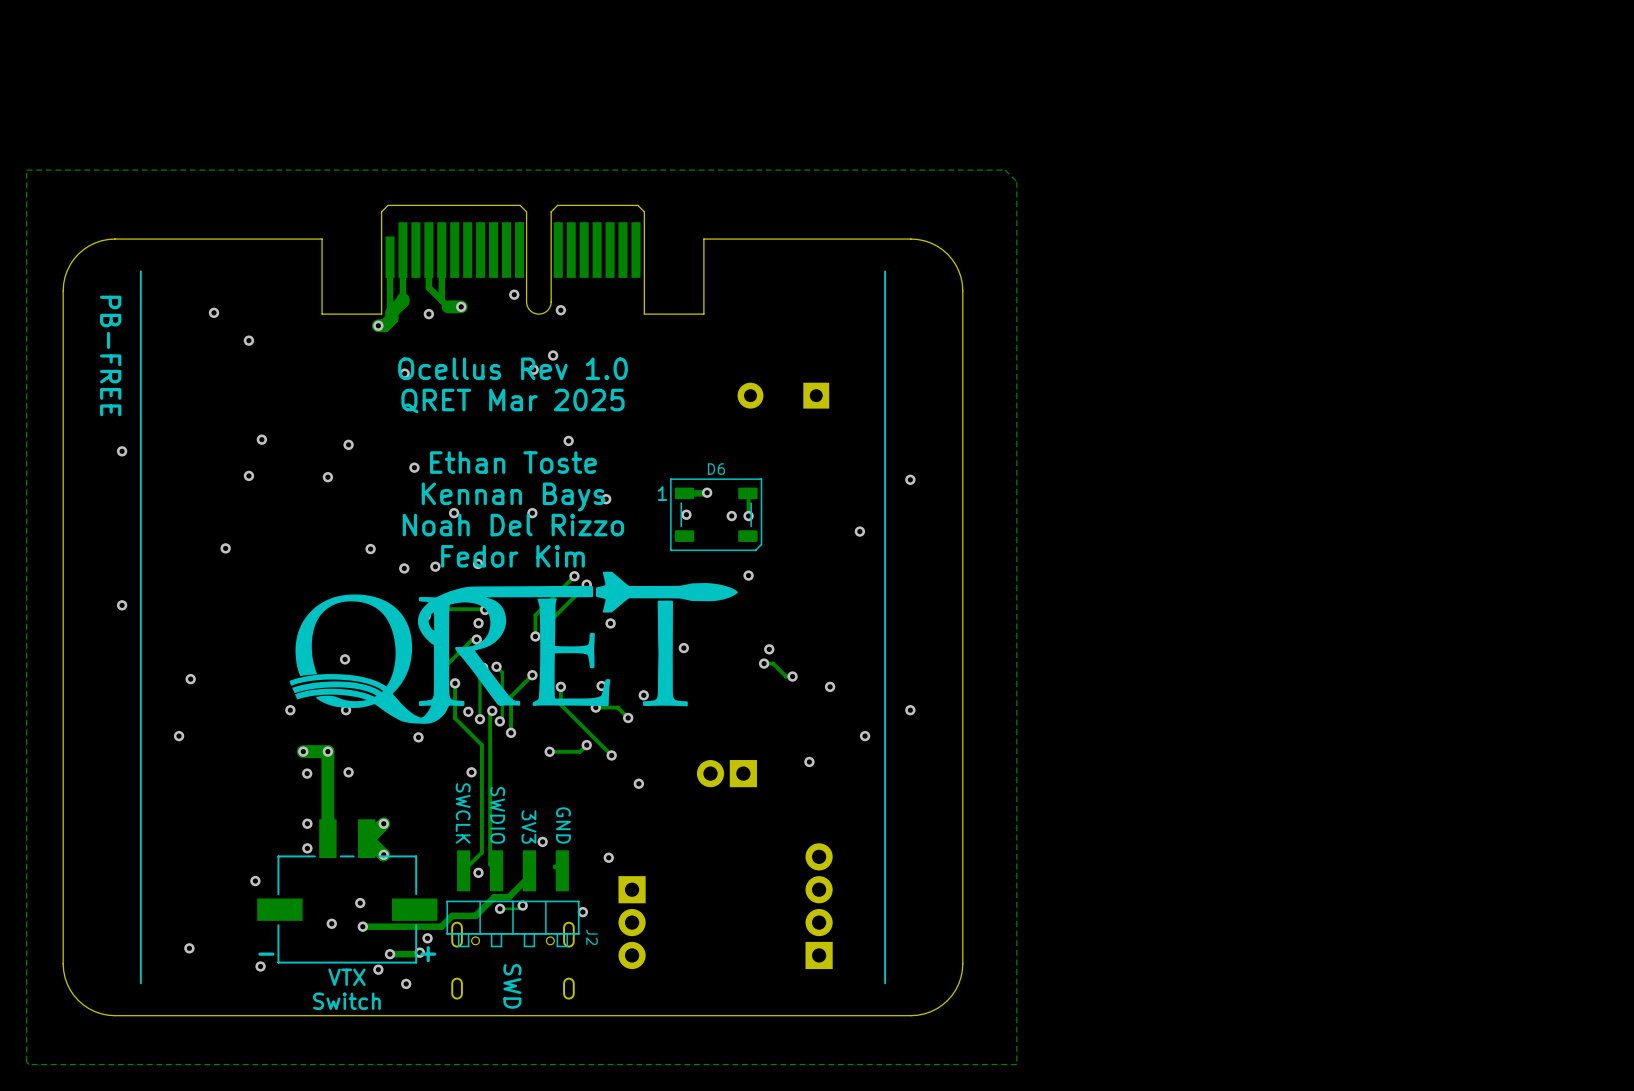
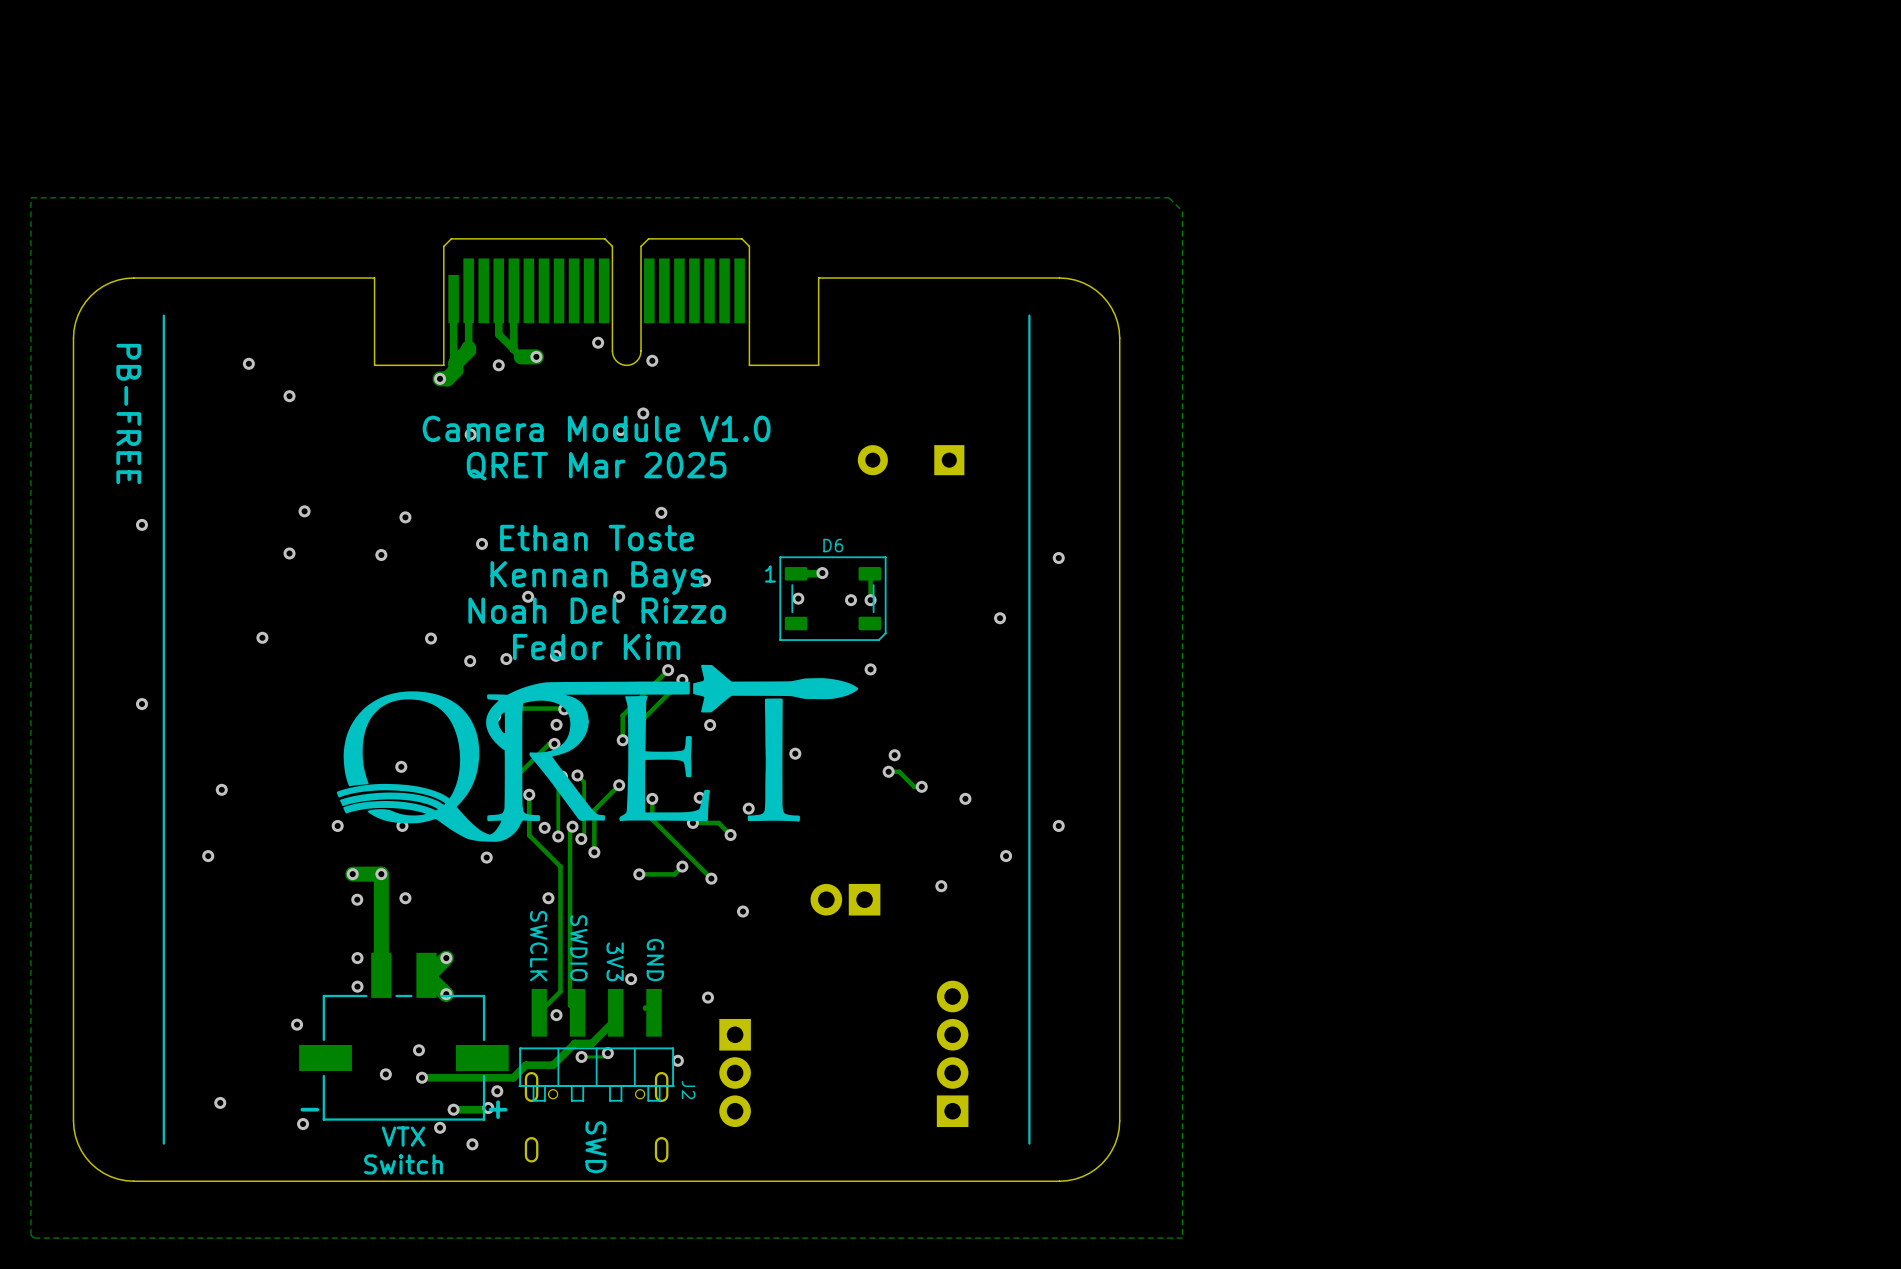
text: Ocellus Rev 1.0 (512, 368) -> Camera Module V1.0 (596, 428)

